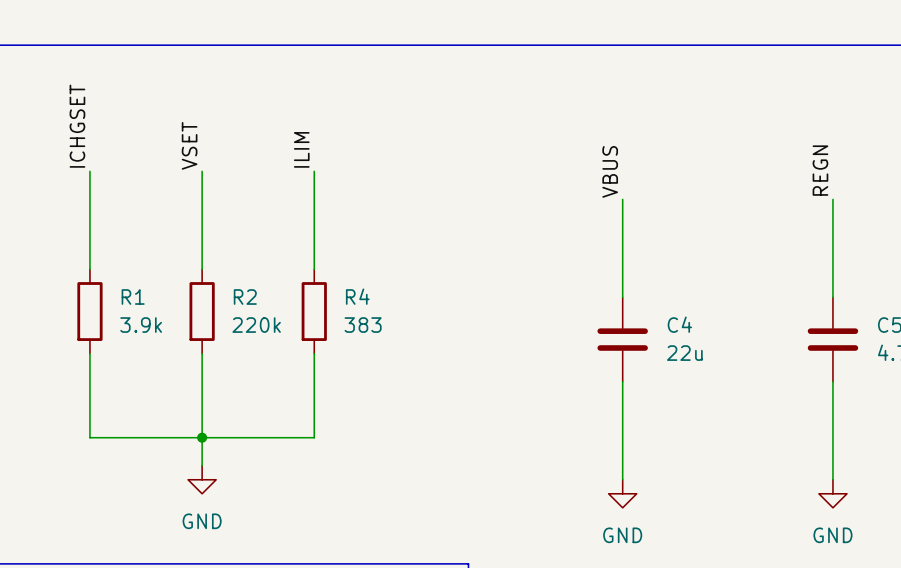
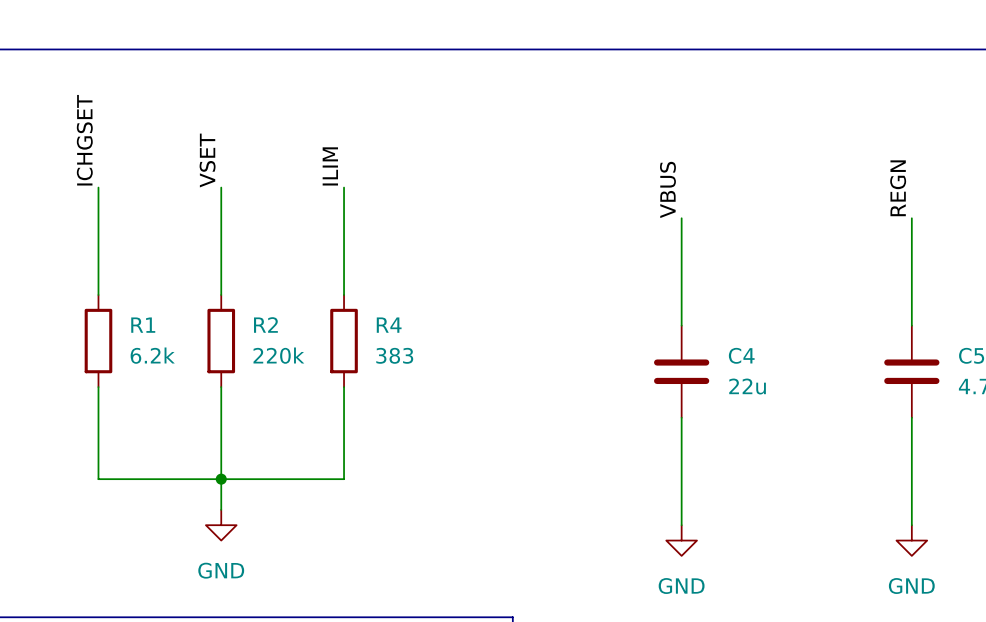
R1 value: 3.9k (141, 325) -> 6.2k (152, 355)

